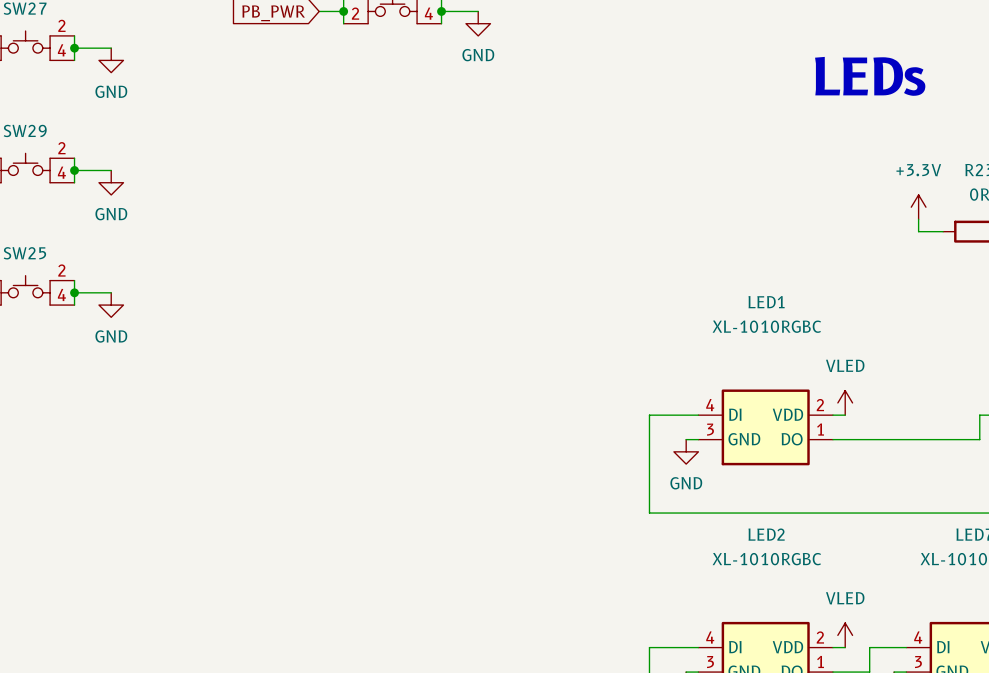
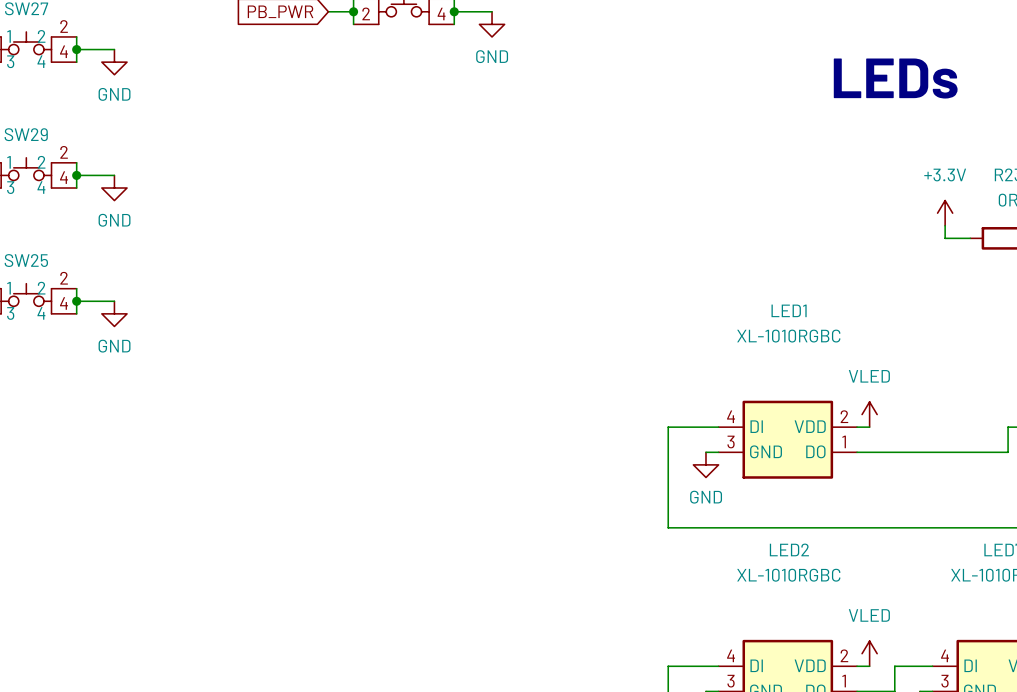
SW27 pin name: none -> 1 (9, 36)
SW27 pin name: none -> 2 (41, 36)
SW27 pin name: none -> 4 (41, 61)
SW27 pin name: none -> 3 (10, 61)
SW29 pin name: none -> 1 (9, 162)
SW29 pin name: none -> 2 (41, 162)
SW29 pin name: none -> 3 (10, 187)
SW29 pin name: none -> 4 (41, 187)
SW25 pin name: none -> 1 (9, 288)
SW25 pin name: none -> 2 (41, 288)
SW25 pin name: none -> 3 (10, 313)
SW25 pin name: none -> 4 (41, 313)

